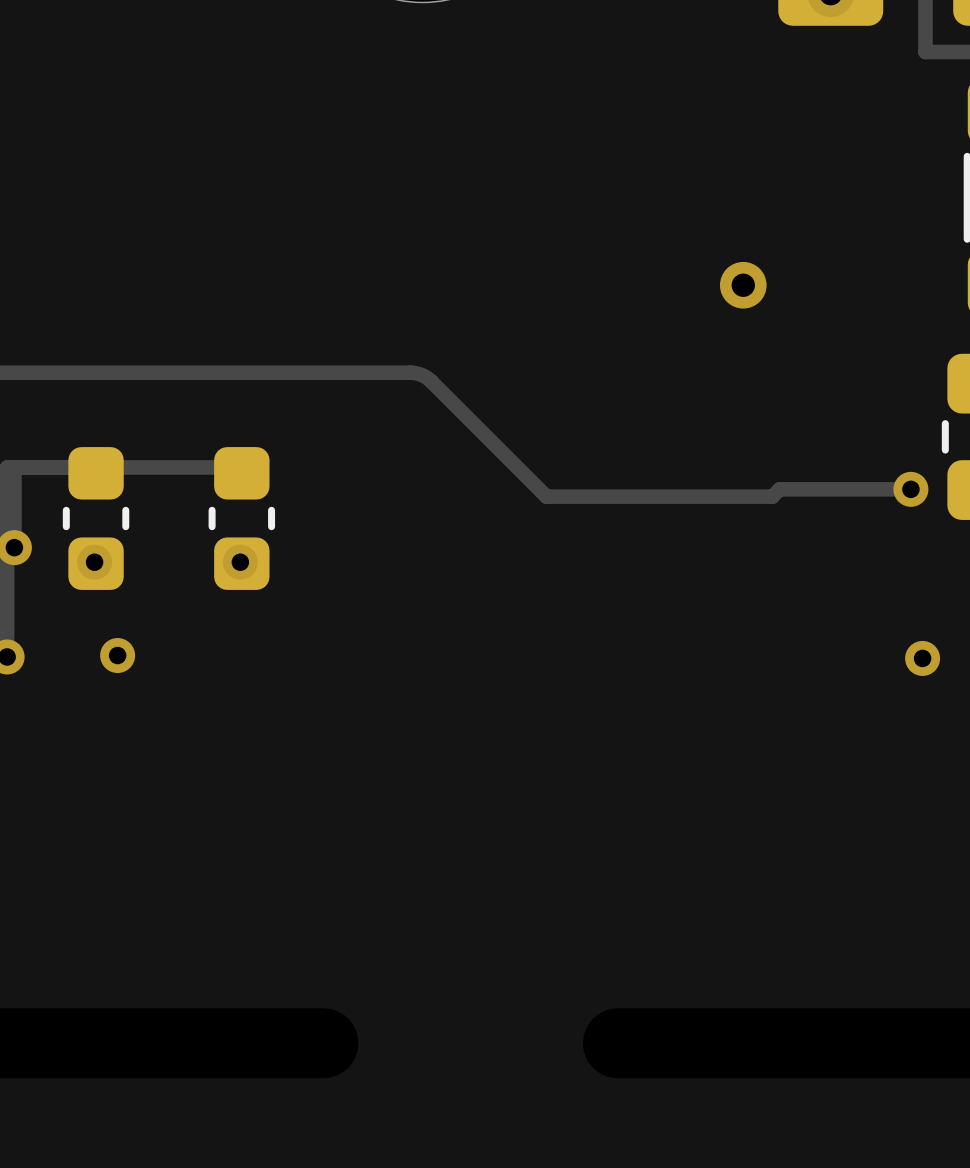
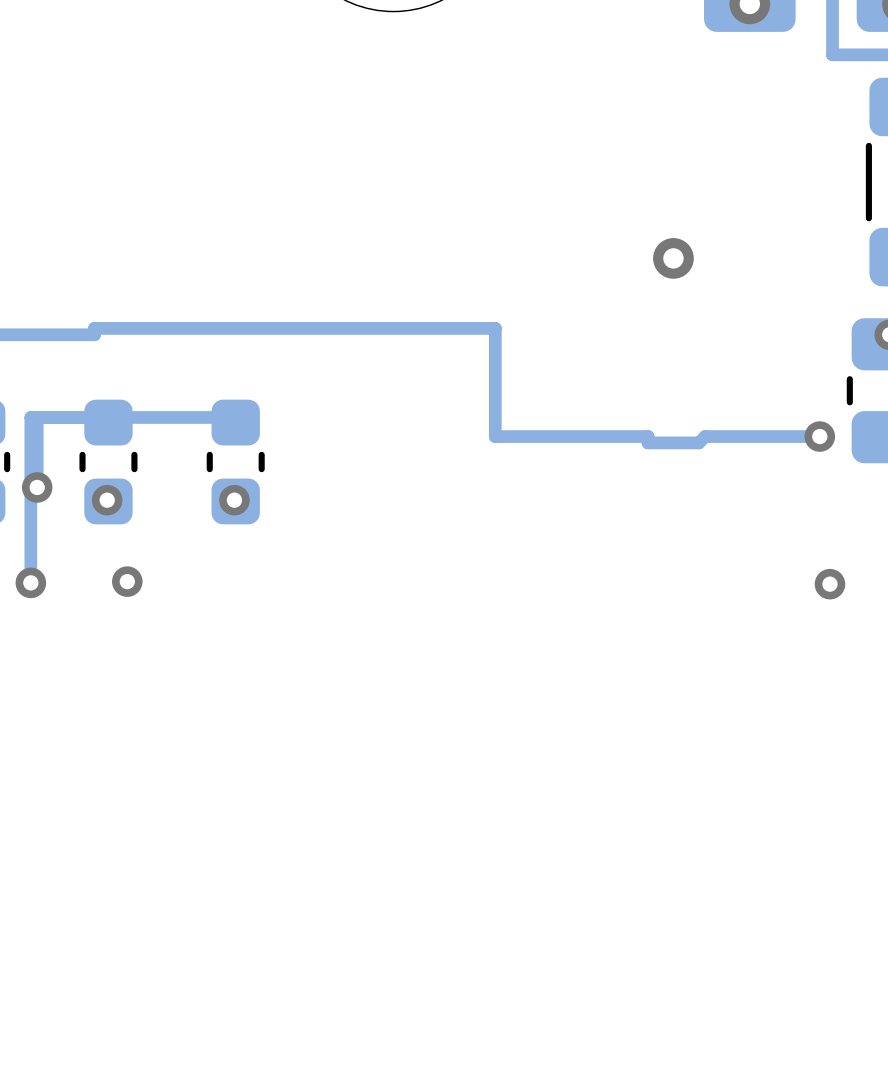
track: (80, 372) (414, 372) (431, 381) (546, 496) (714, 496) -> (94, 334) (94, 328) (495, 328) (495, 436) (648, 436) (648, 442)

